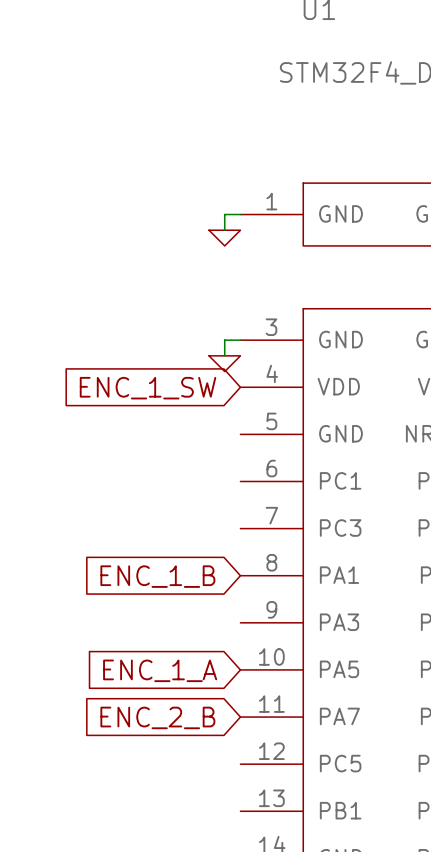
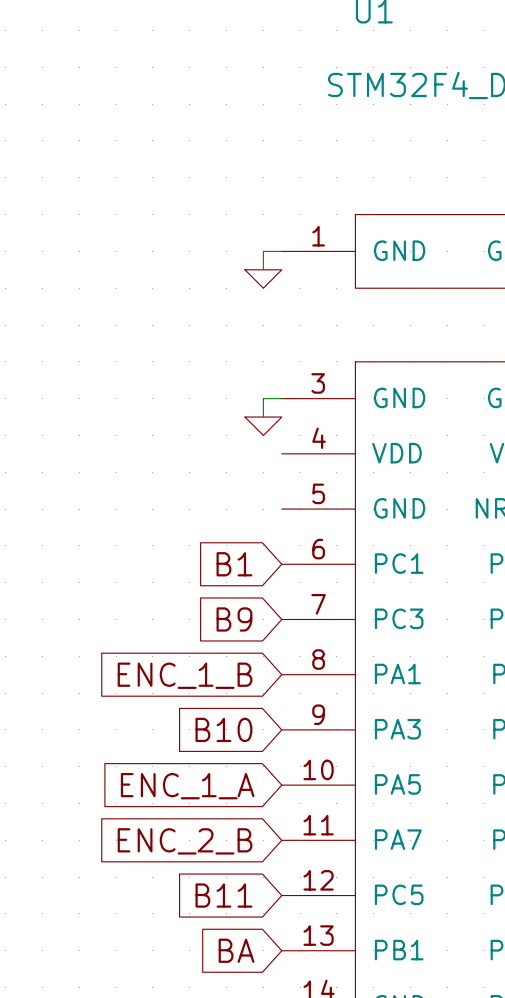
global label: ENC_1_SW (148, 388) -> none
global label: none -> B1 (234, 564)
global label: none -> B9 (234, 619)
global label: none -> B10 (223, 729)
global label: none -> B11 (223, 895)
global label: none -> BA (236, 950)

